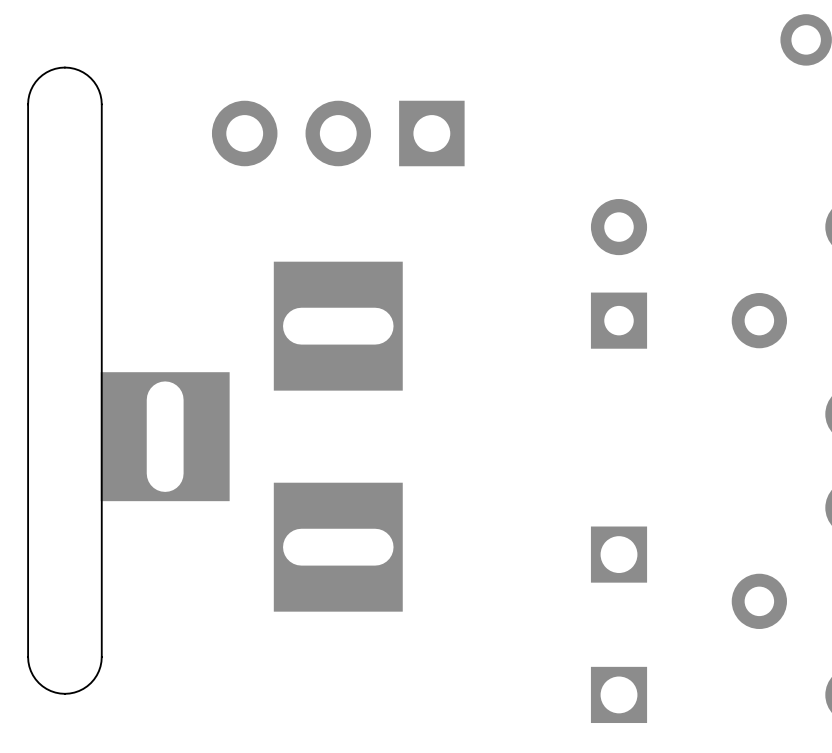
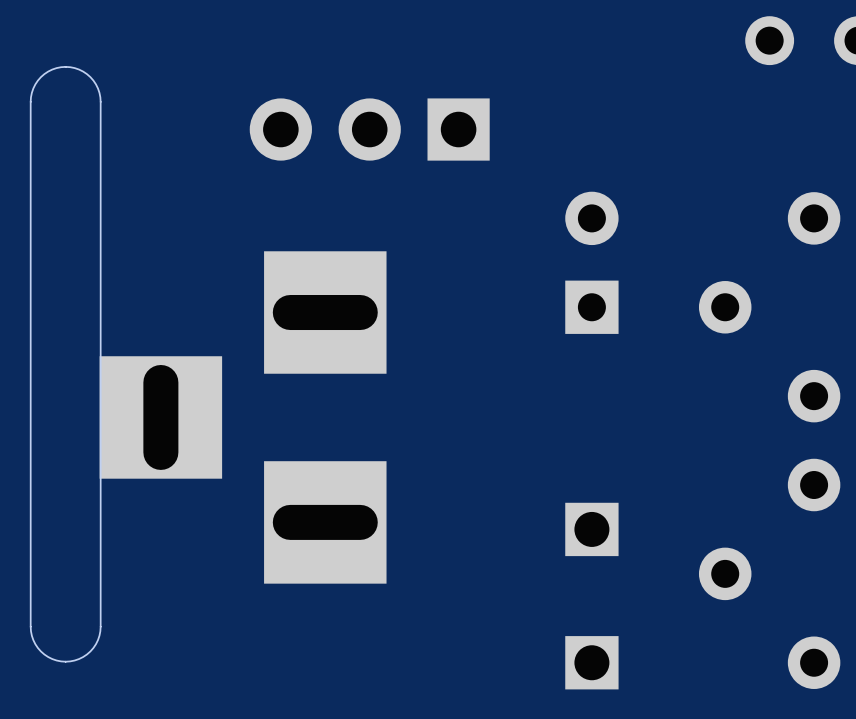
part: (338, 133) -> none
part: none -> (369, 129)

